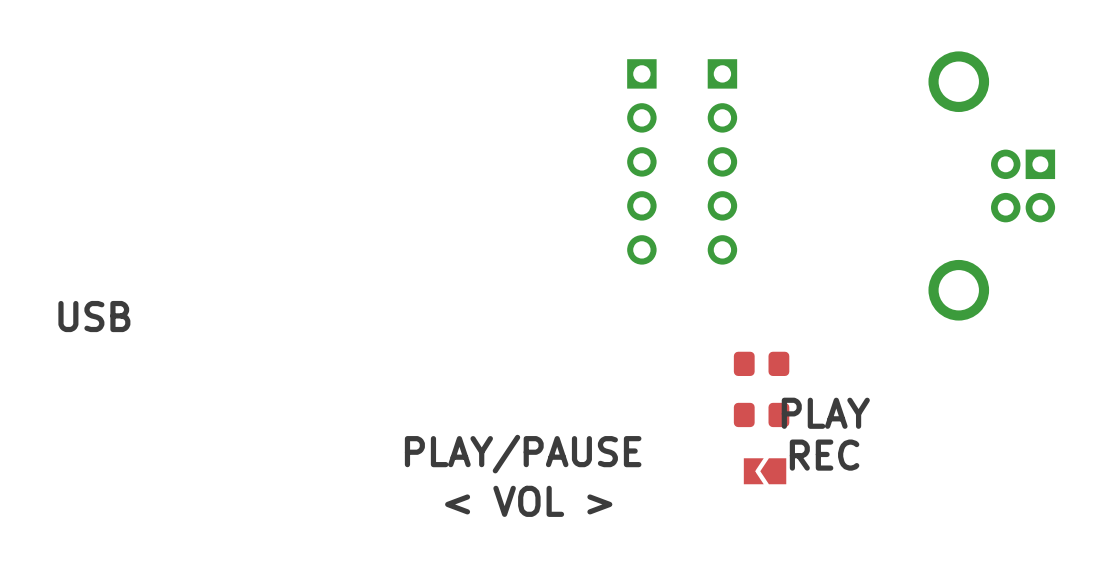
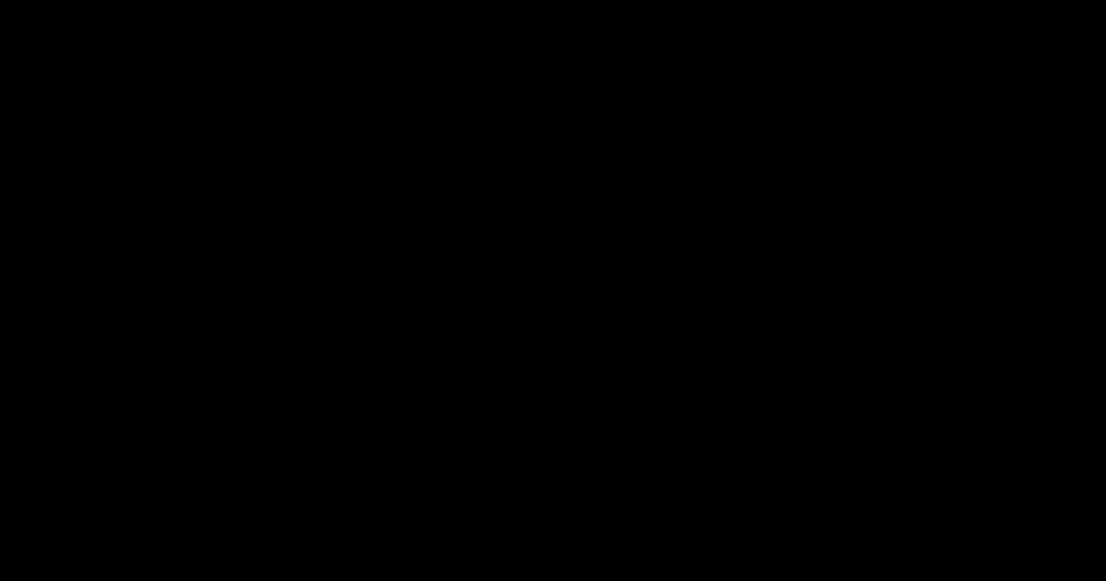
part: (641, 161) -> none
part: (722, 161) -> none
part: (991, 185) -> none
text: USB (94, 316) -> none
part: (761, 363) -> none
text: PLAY (825, 413) -> none
part: (761, 414) -> none
text: PLAY/PAUSE (523, 454) -> none
text: REC (824, 455) -> none
part: (765, 471) -> none
text: < VOL > (528, 501) -> none

